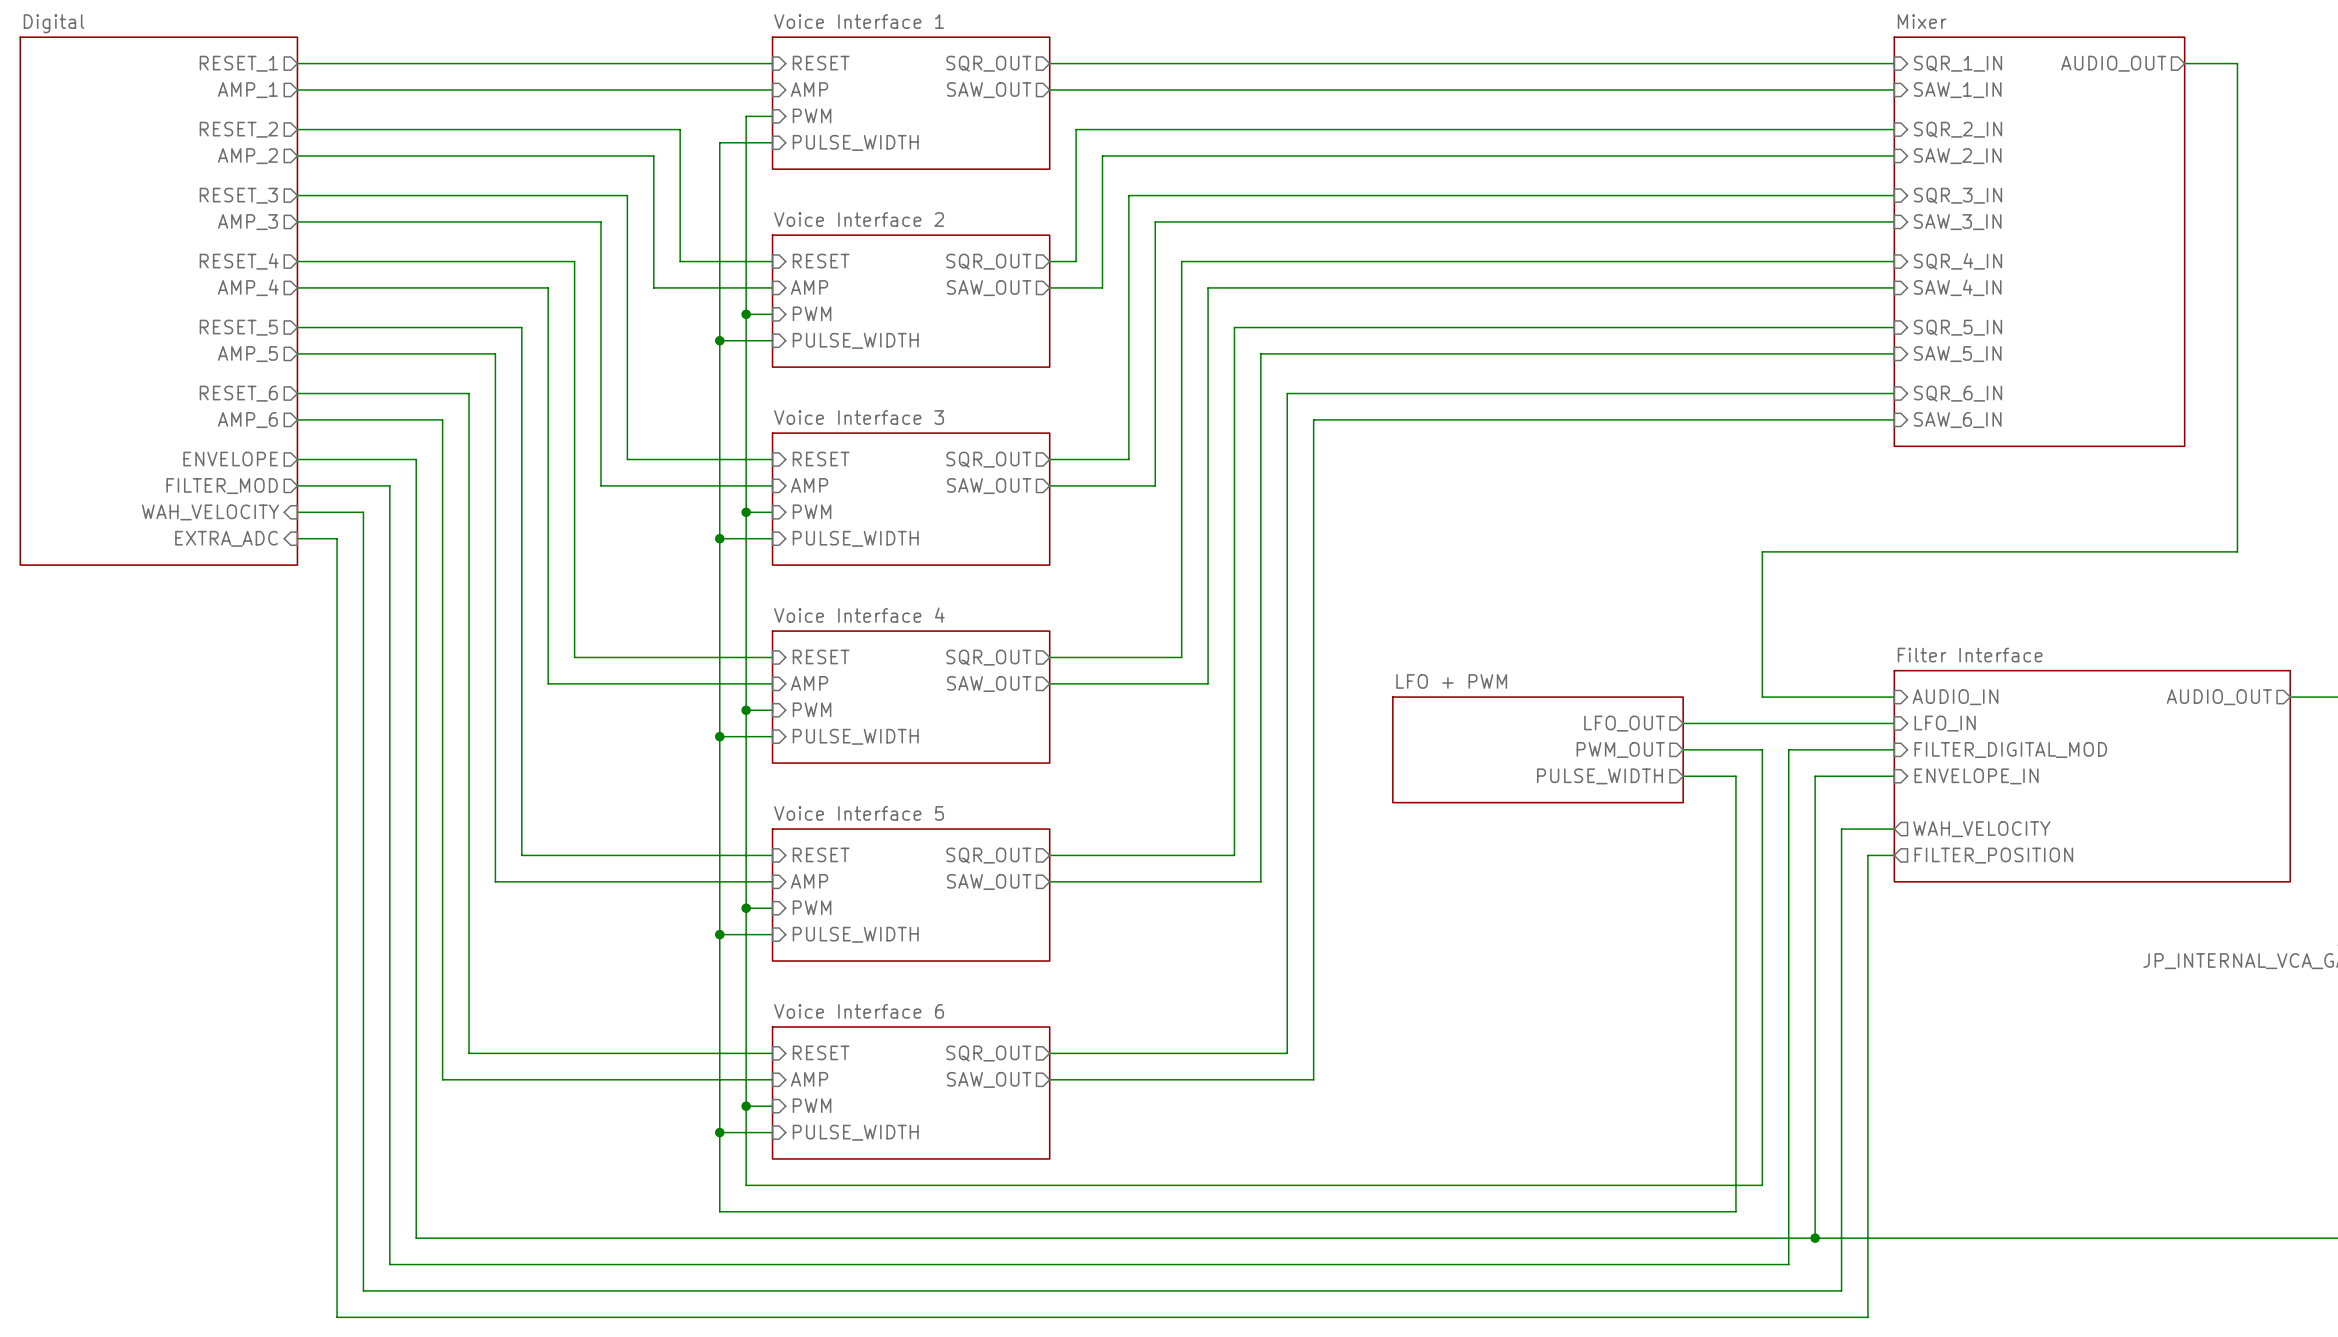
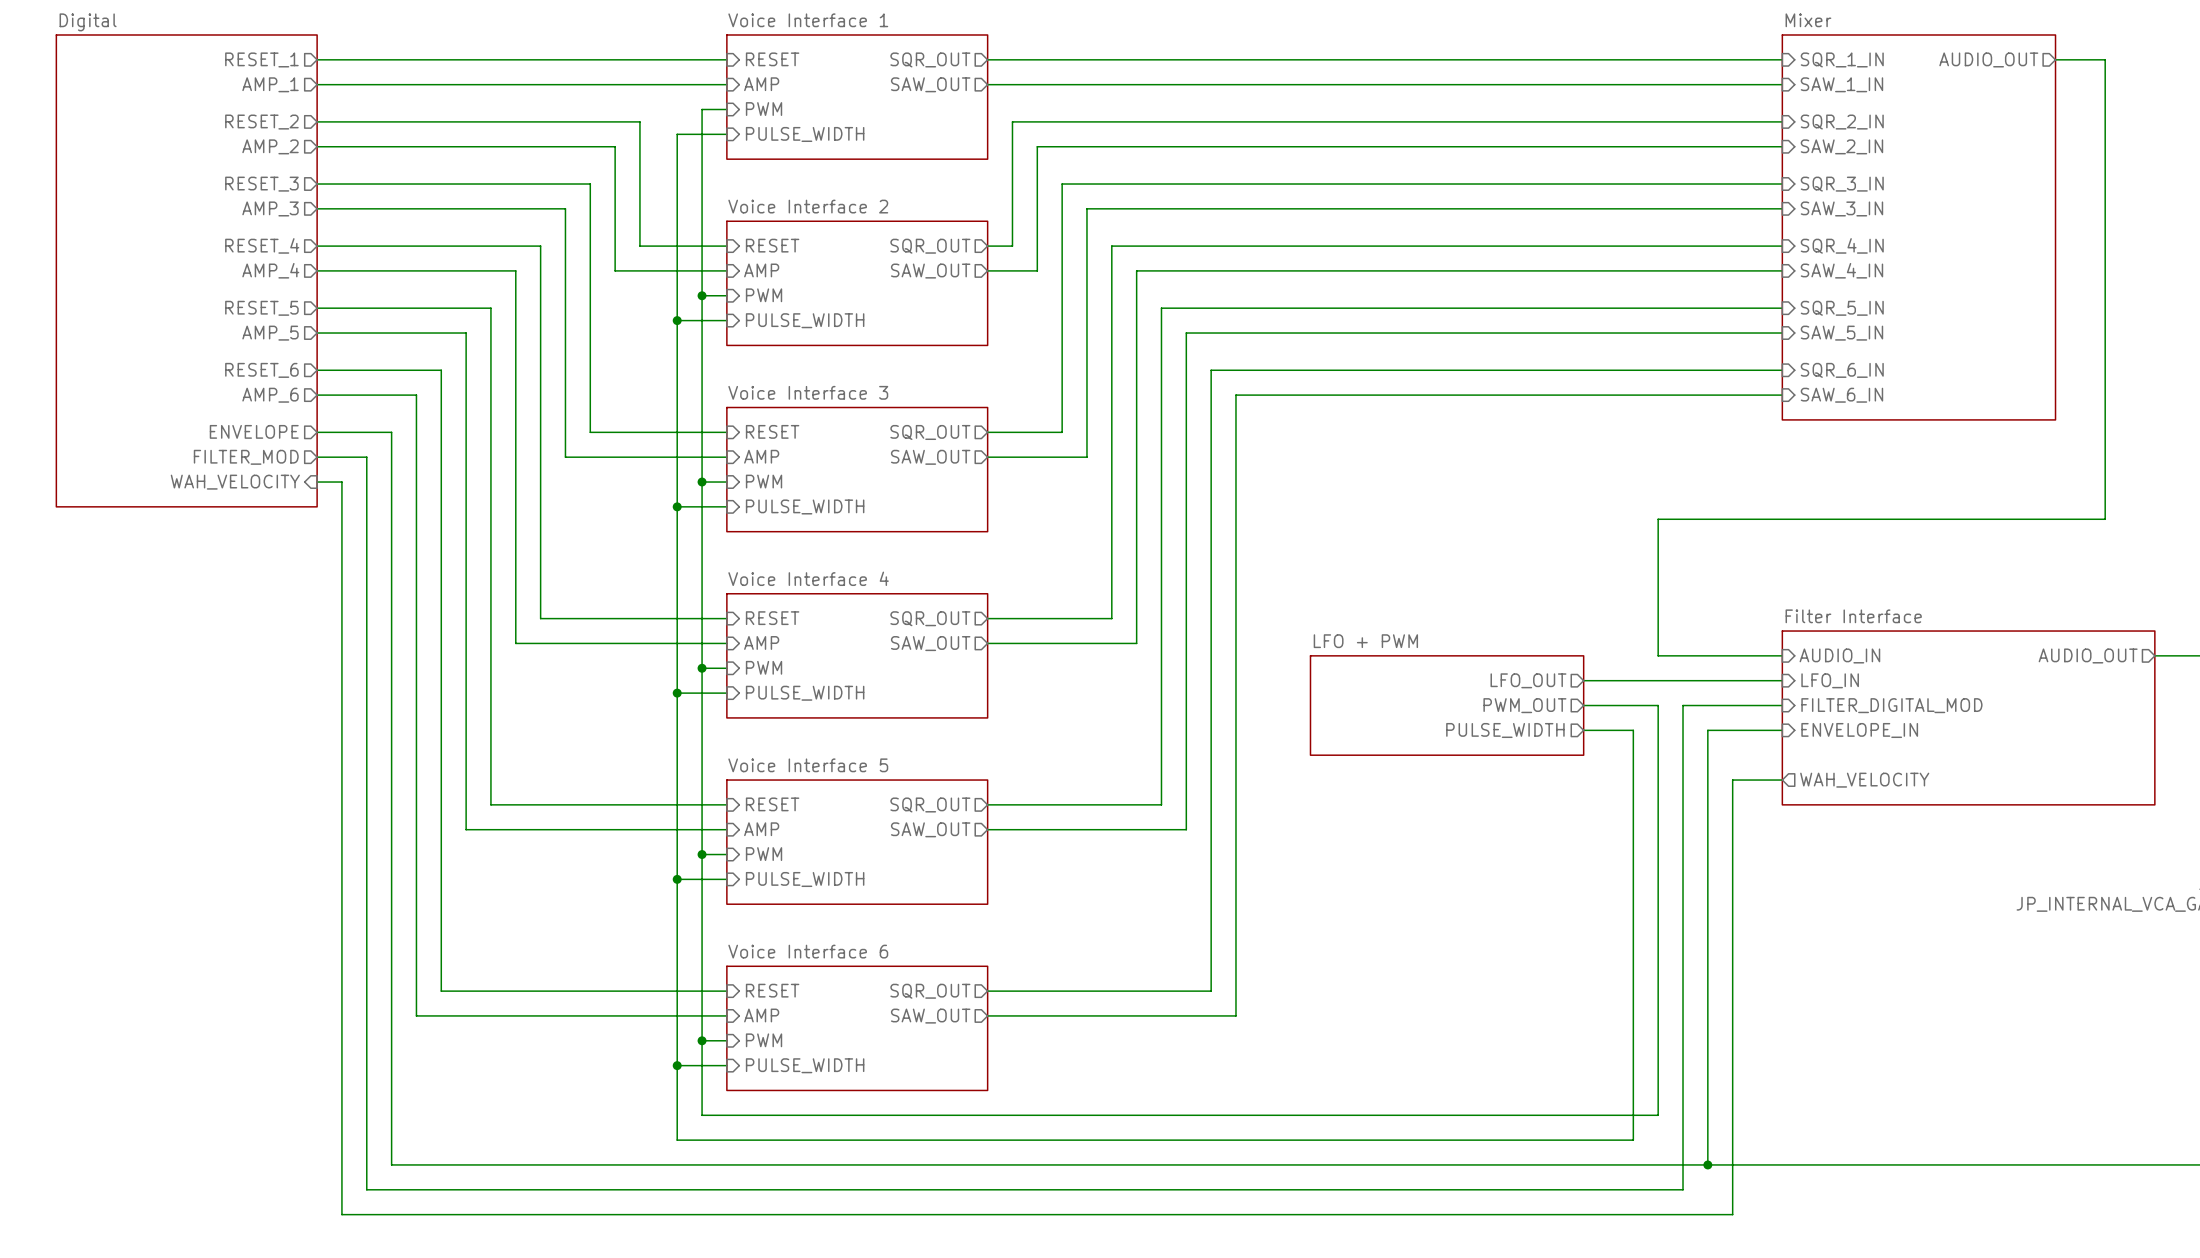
sheet pin position: RESET_1 (238, 63) -> RESET_1 (261, 59)
wire: (297, 63) (337, 63) -> none
wire: (297, 89) (337, 89) -> none
sheet pin position: AMP_1 (247, 90) -> AMP_1 (270, 84)
sheet pin position: RESET_2 (238, 129) -> RESET_2 (261, 122)
wire: (297, 129) (337, 129) -> none
wire: (297, 155) (337, 155) -> none
sheet pin position: AMP_2 (247, 156) -> AMP_2 (270, 146)
sheet pin position: RESET_3 (238, 195) -> RESET_3 (261, 184)
wire: (297, 195) (337, 195) -> none
wire: (297, 221) (337, 221) -> none
sheet pin position: AMP_3 (247, 222) -> AMP_3 (270, 208)
sheet pin position: RESET_4 (239, 261) -> RESET_4 (262, 245)
wire: (297, 261) (337, 261) -> none
sheet Digital: none -> (186, 270)
sheet pin position: AMP_4 (248, 287) -> AMP_4 (270, 270)
wire: (297, 287) (337, 287) -> none
sheet Digital: (158, 301) -> none
sheet pin position: RESET_5 (238, 327) -> RESET_5 (261, 308)
wire: (297, 327) (337, 327) -> none
wire: (297, 353) (337, 353) -> none
sheet pin position: AMP_5 (247, 354) -> AMP_5 (270, 333)
sheet pin position: RESET_6 (238, 393) -> RESET_6 (261, 370)
wire: (297, 393) (337, 393) -> none
wire: (297, 419) (337, 419) -> none
sheet pin position: AMP_6 (247, 420) -> AMP_6 (270, 395)
sheet pin position: ENVELOPE (230, 459) -> ENVELOPE (254, 431)
wire: (297, 459) (337, 459) -> none
wire: (297, 485) (337, 485) -> none
sheet pin position: FILTER_MOD (222, 486) -> FILTER_MOD (246, 457)
sheet pin position: WAH_VELOCITY (210, 512) -> WAH_VELOCITY (235, 482)
wire: (297, 512) (337, 512) -> none
sheet pin: EXTRA_ADC (226, 538) -> none
wire: (297, 538) (337, 538) (337, 1317) (1867, 1317) (1867, 855) (1894, 855) -> none
sheet Filter Interface: none -> (1968, 717)
sheet Filter Interface: (2092, 776) -> none
sheet pin: FILTER_POSITION (1993, 855) -> none

